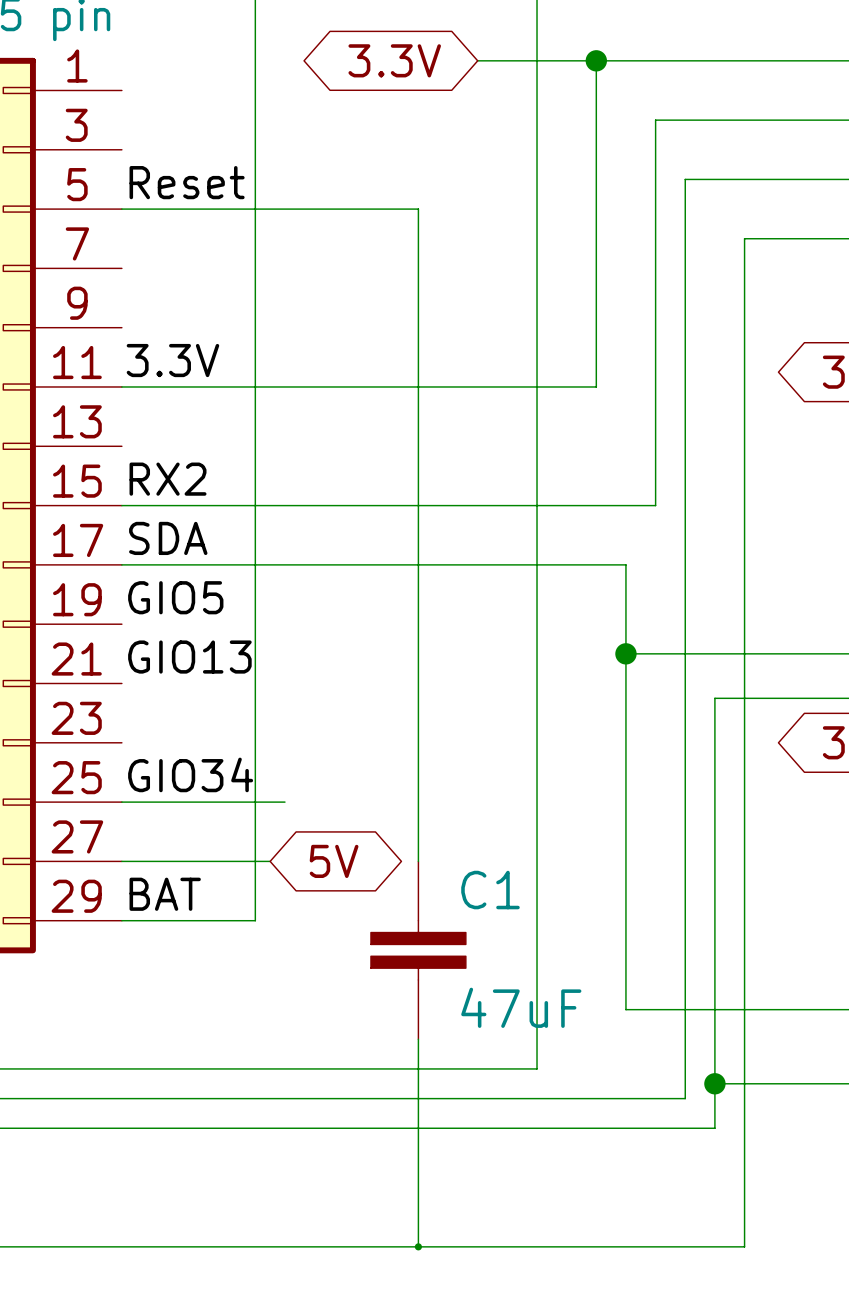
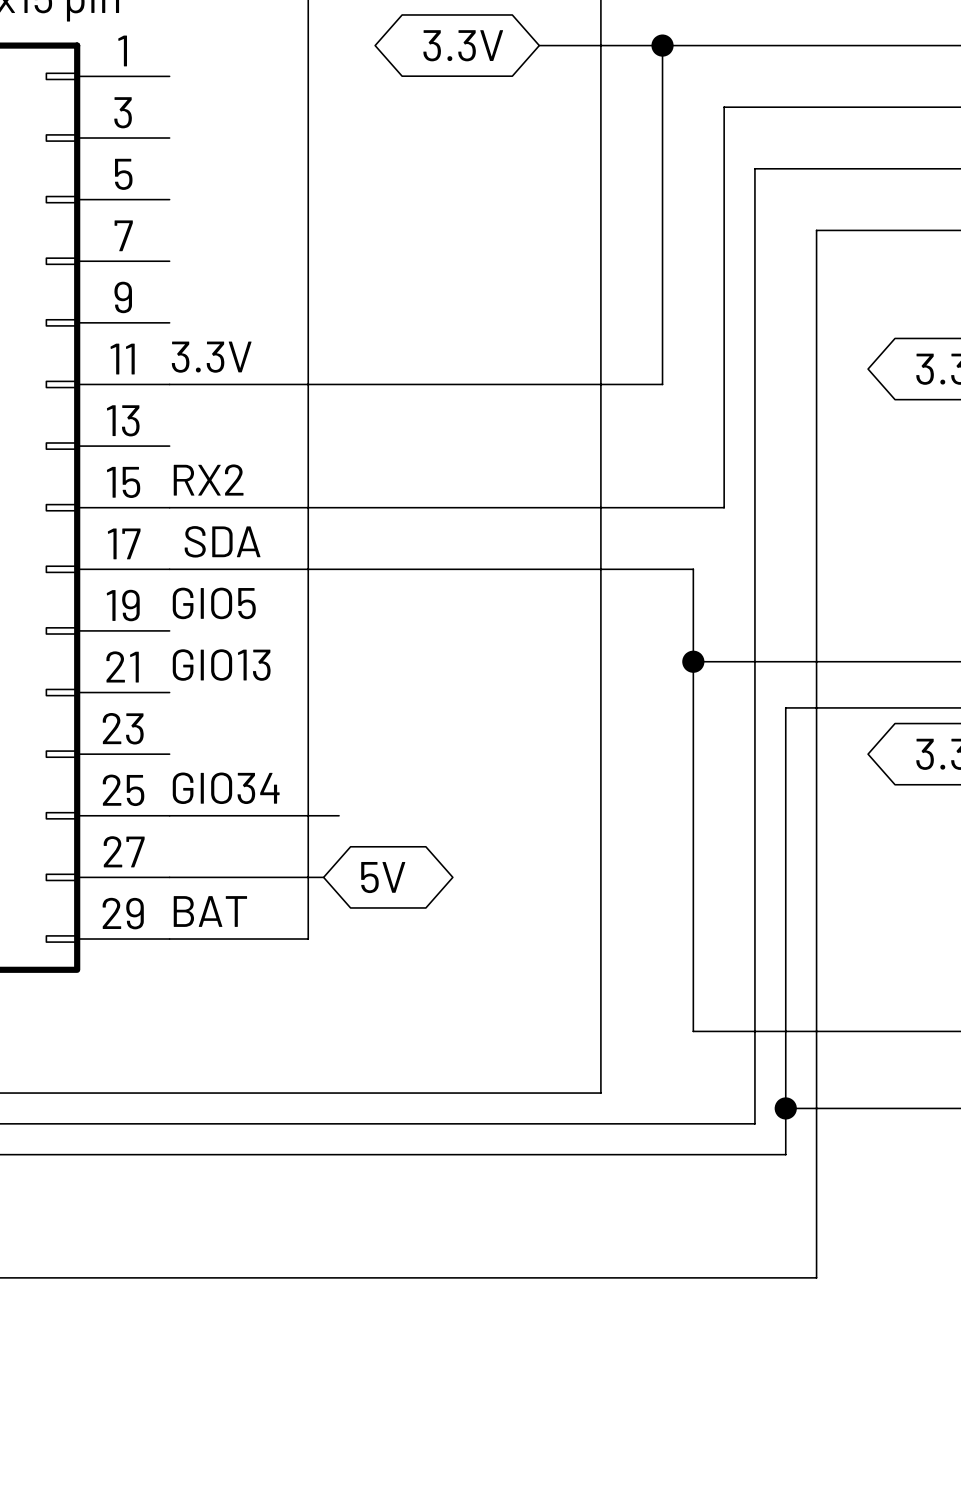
label: Reset (187, 182) -> none
wire: (121, 209) (418, 209) (418, 861) -> none
C1: 47uF (418, 950) -> none
wire: (418, 1039) (418, 1246) -> none
junction: (418, 1246) -> none

